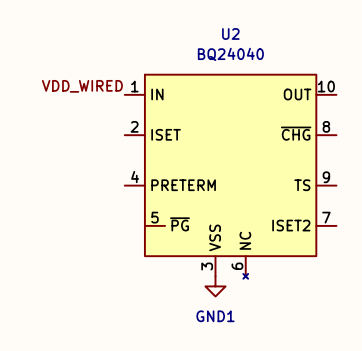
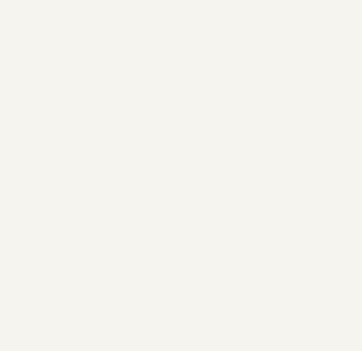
label: VDD_WIRED (82, 86) -> none
U2: BQ24040 (230, 176) -> none
power symbol: GND1 (215, 286) -> none

